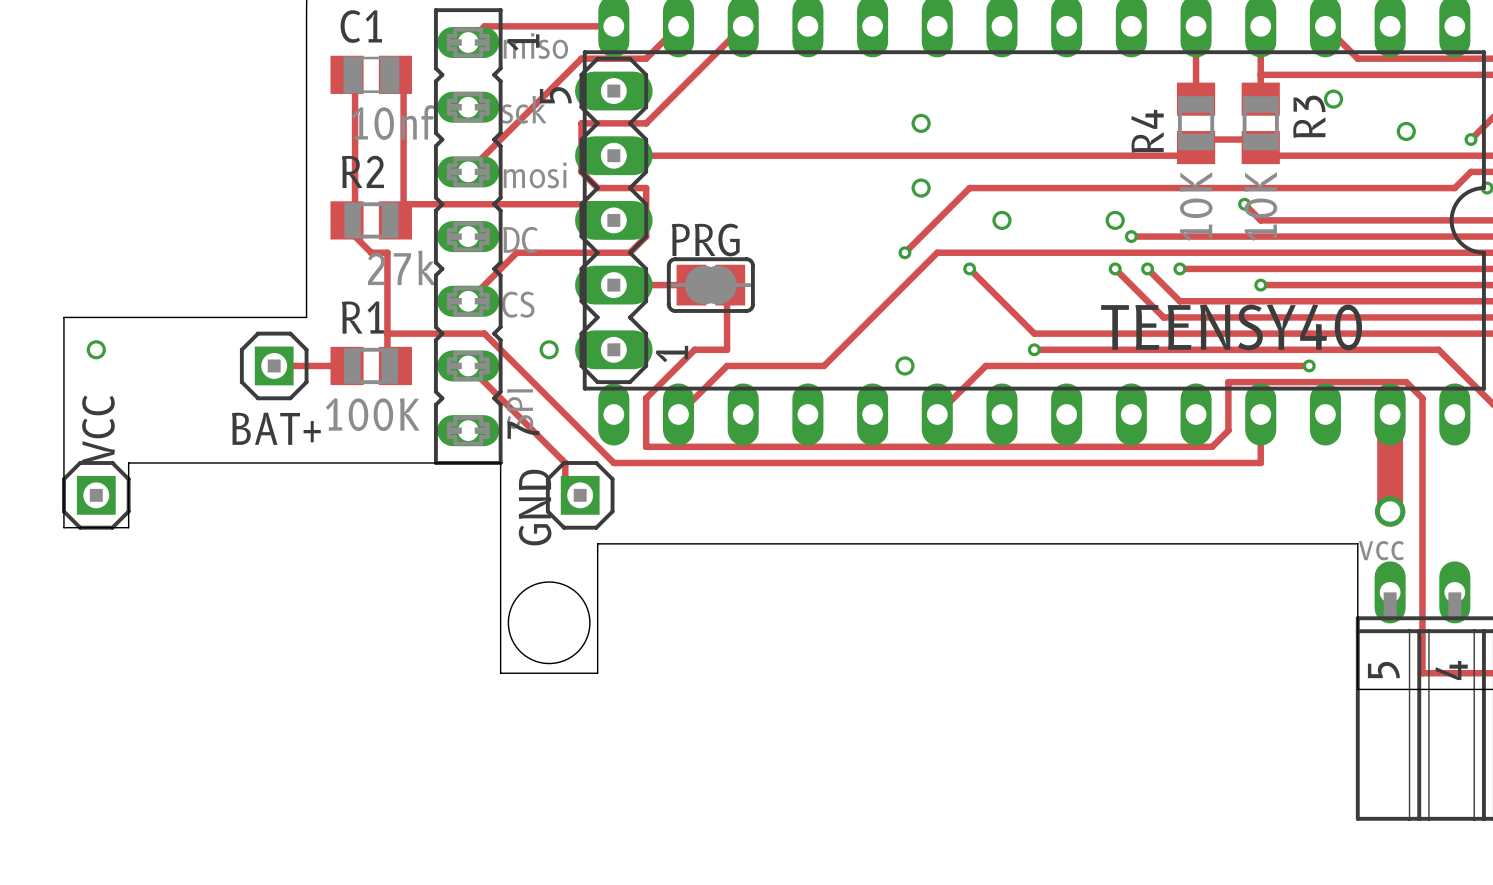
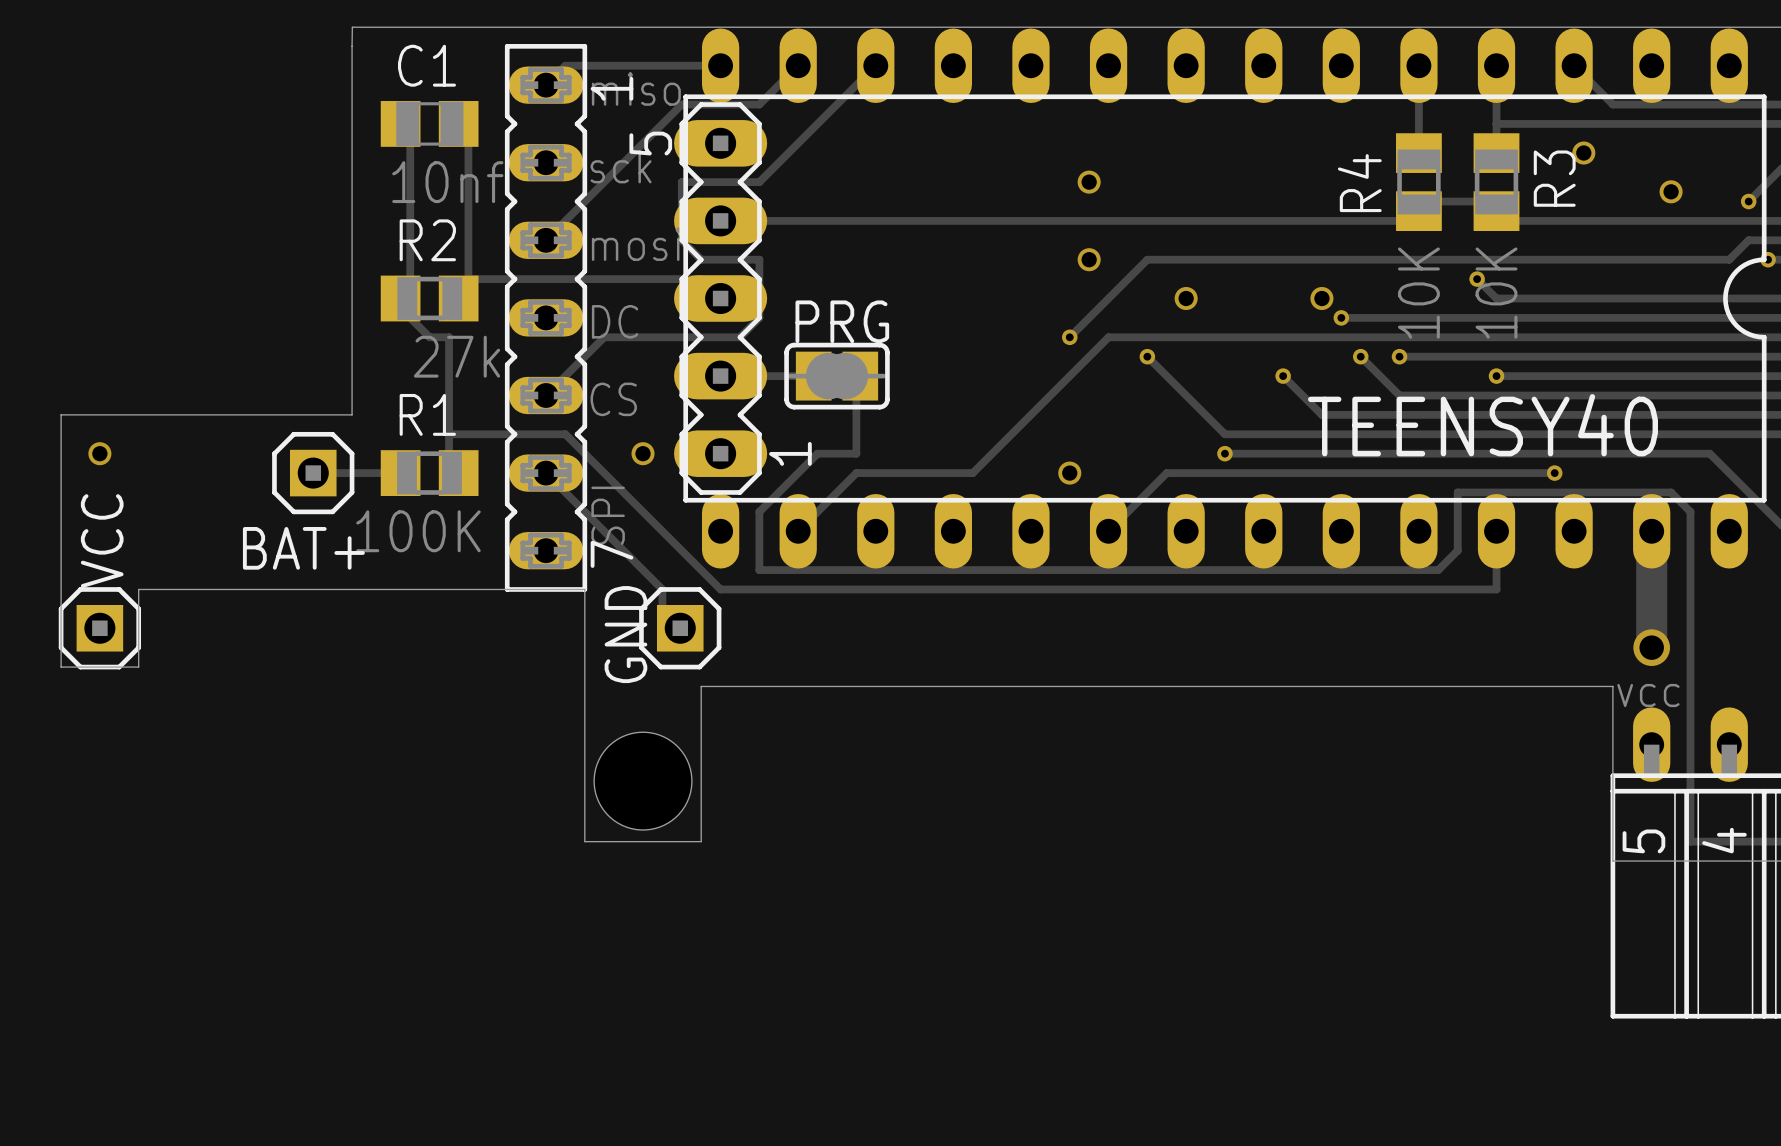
track: (1115, 268) (1163, 317) -> (1283, 376) (1321, 414) (1380, 414)
via position: (1115, 268) -> (1283, 376)

